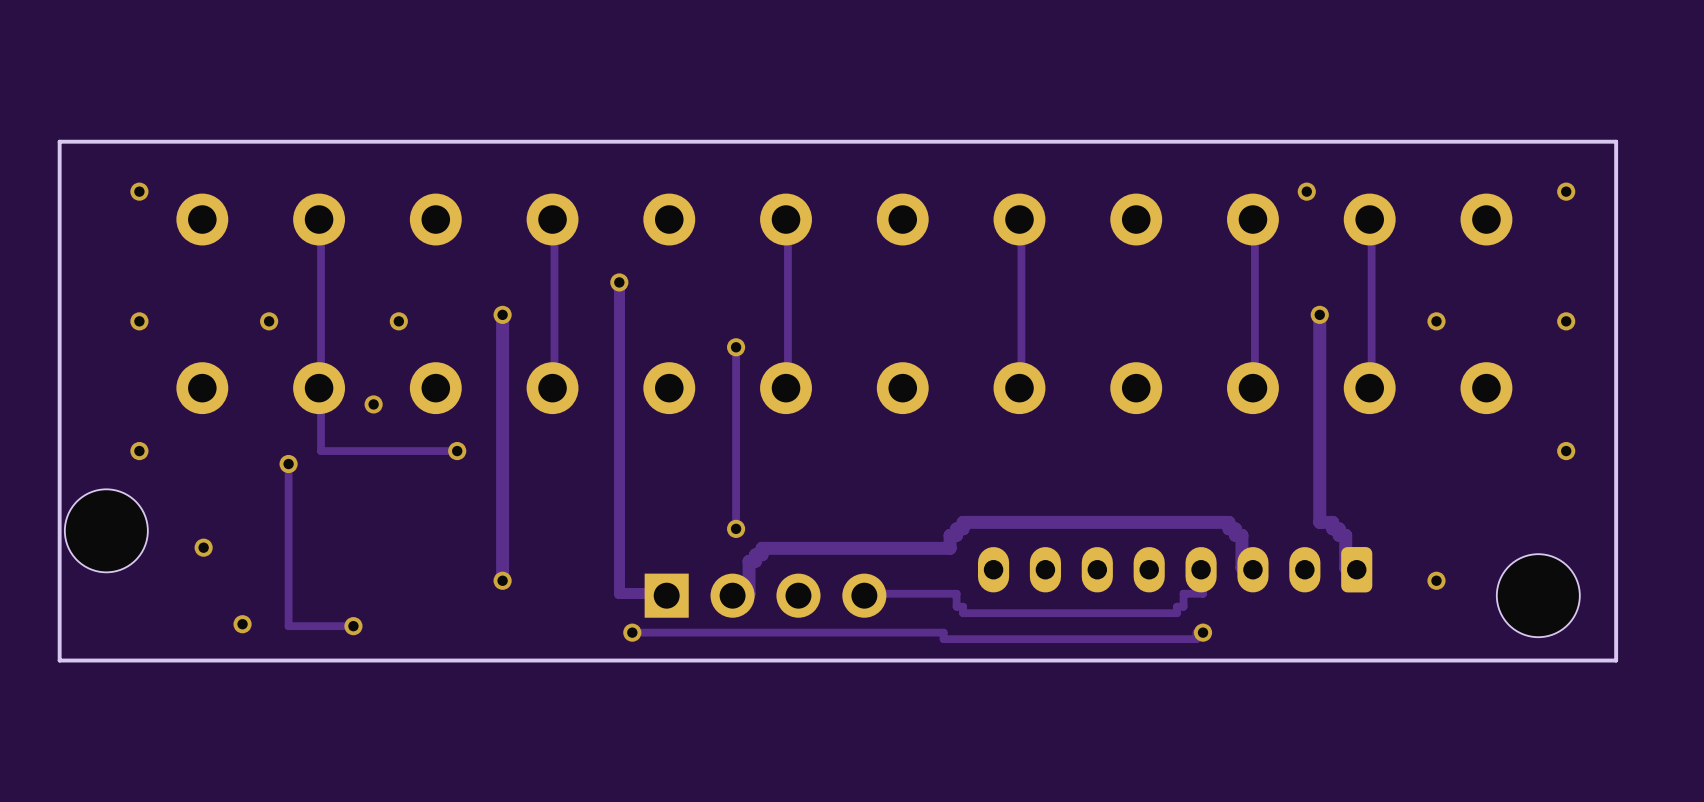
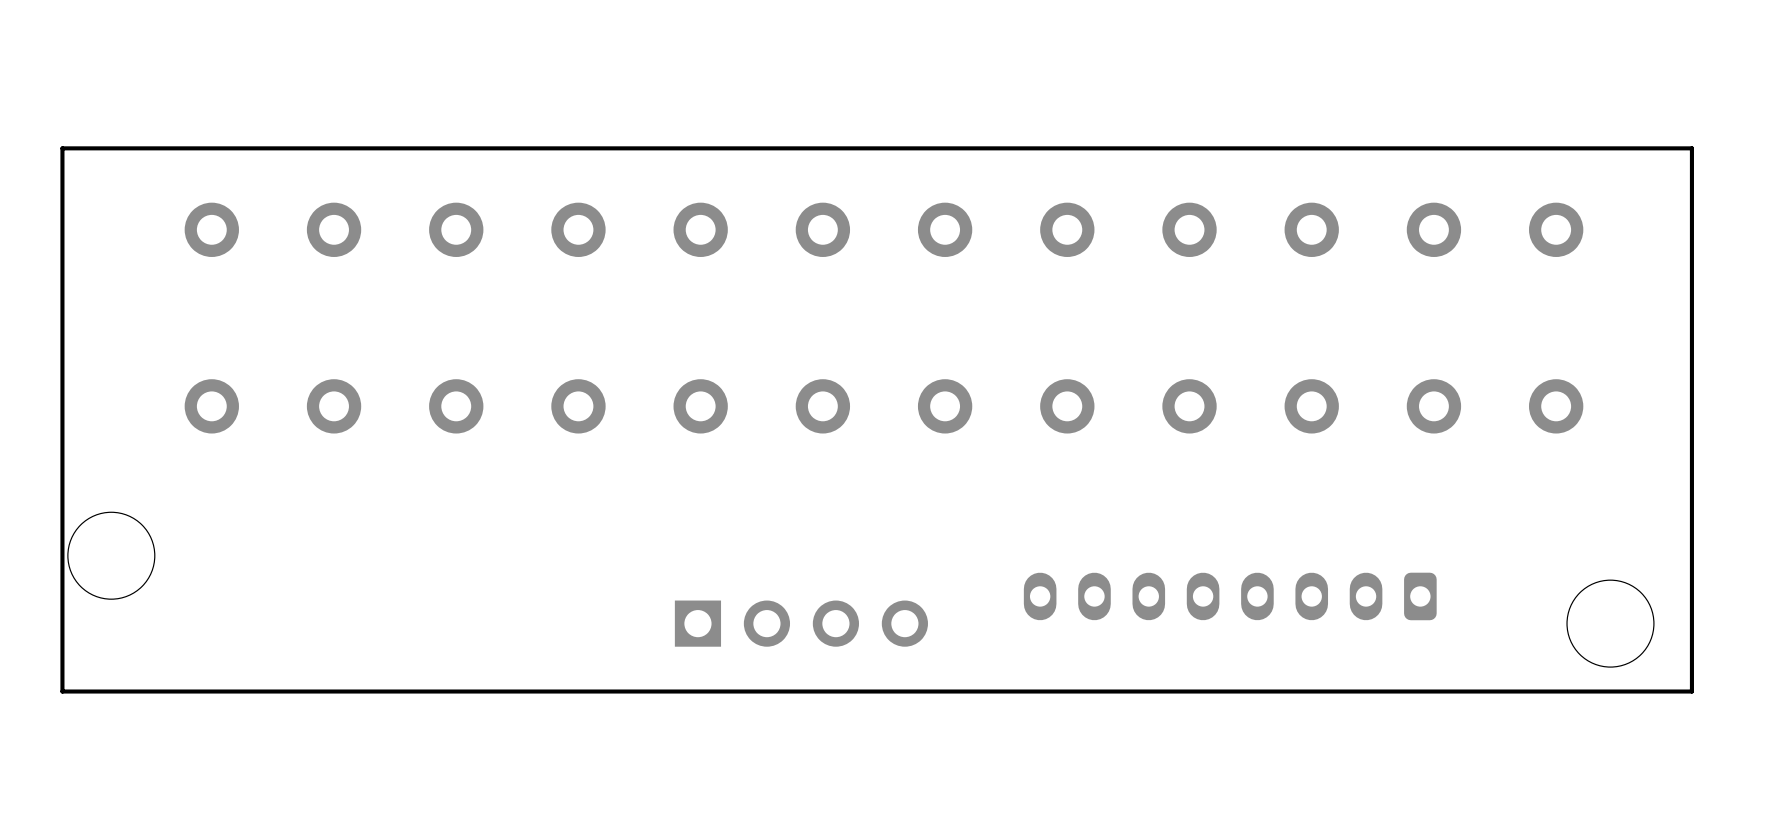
via: (139, 191) -> none
via: (1306, 191) -> none
via: (1566, 191) -> none
track: (321, 217) (321, 451) (457, 451) -> none
track: (554, 217) (554, 386) -> none
track: (787, 217) (787, 386) -> none
track: (1021, 217) (1021, 386) -> none
track: (1254, 217) (1254, 386) -> none
track: (1371, 217) (1371, 386) -> none
track: (619, 282) (619, 593) (664, 593) -> none
via: (619, 282) -> none
track: (502, 314) (502, 580) -> none
via: (502, 314) -> none
track: (1319, 314) (1319, 522) (1332, 522) (1332, 528) (1339, 528) (1339, 535) (1345, 535) (1345, 567) (1358, 567) -> none
via: (1319, 314) -> none
via: (139, 321) -> none
via: (269, 321) -> none
via: (398, 321) -> none
via: (1436, 321) -> none
via: (1566, 321) -> none
track: (736, 347) (736, 528) -> none
via: (736, 347) -> none
via: (373, 404) -> none
via: (139, 451) -> none
via: (457, 451) -> none
via: (1566, 451) -> none
track: (288, 464) (288, 626) (353, 626) -> none
via: (288, 464) -> none
via: (736, 528) -> none
via: (203, 547) -> none
track: (1203, 567) (1203, 593) (1183, 593) (1183, 606) (1177, 606) (1177, 613) (963, 613) (963, 606) (956, 606) (956, 593) (865, 593) -> none
track: (1254, 567) (1241, 567) (1241, 535) (1235, 535) (1235, 528) (1228, 528) (1228, 522) (963, 522) (963, 528) (956, 528) (956, 535) (950, 535) (950, 548) (762, 548) (762, 554) (755, 554) (755, 561) (749, 561) (749, 593) (729, 593) -> none
via: (502, 580) -> none
via: (1436, 580) -> none
via: (242, 624) -> none
via: (353, 626) -> none
via: (632, 632) -> none
track: (1203, 632) (1196, 632) (1196, 639) (943, 639) (943, 632) (632, 632) -> none
via: (1203, 632) -> none

